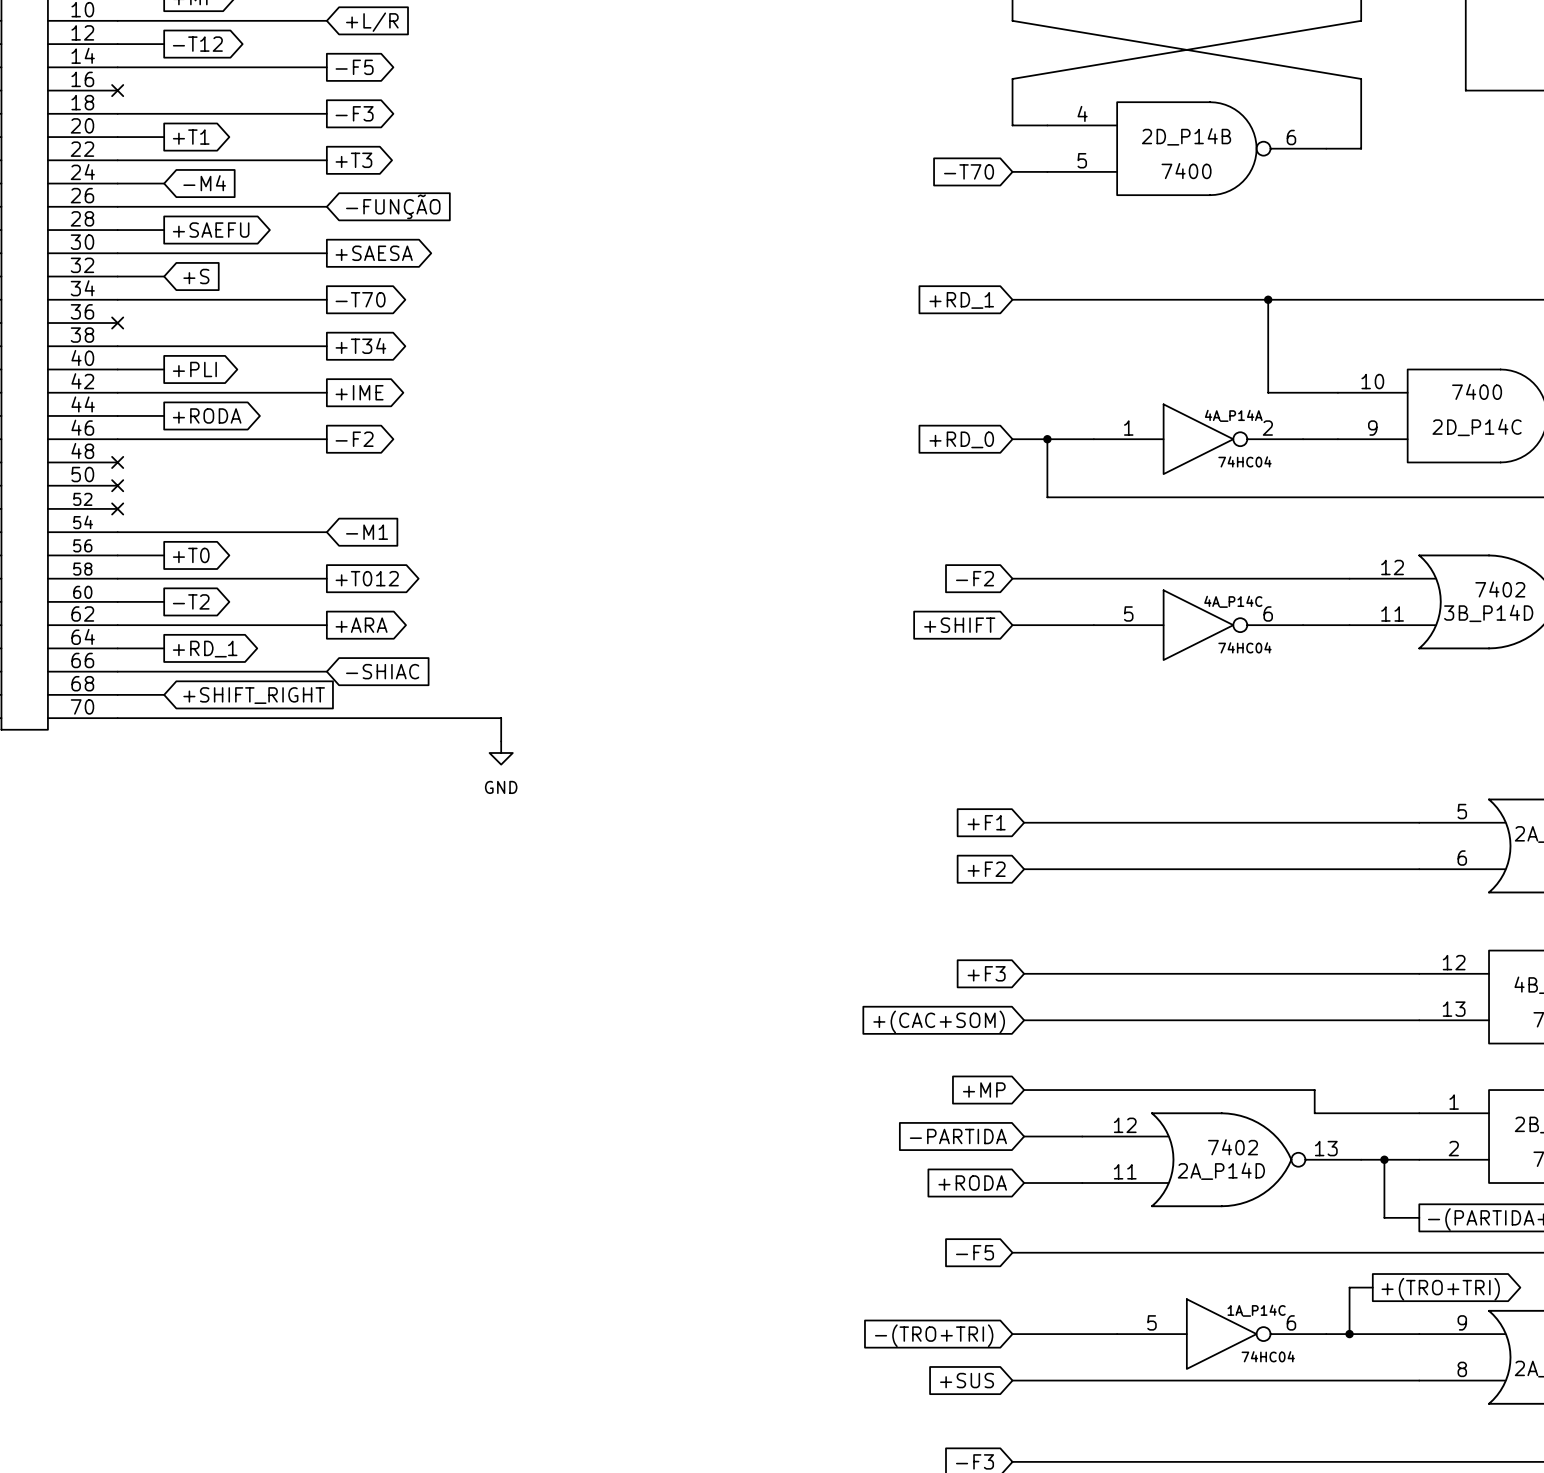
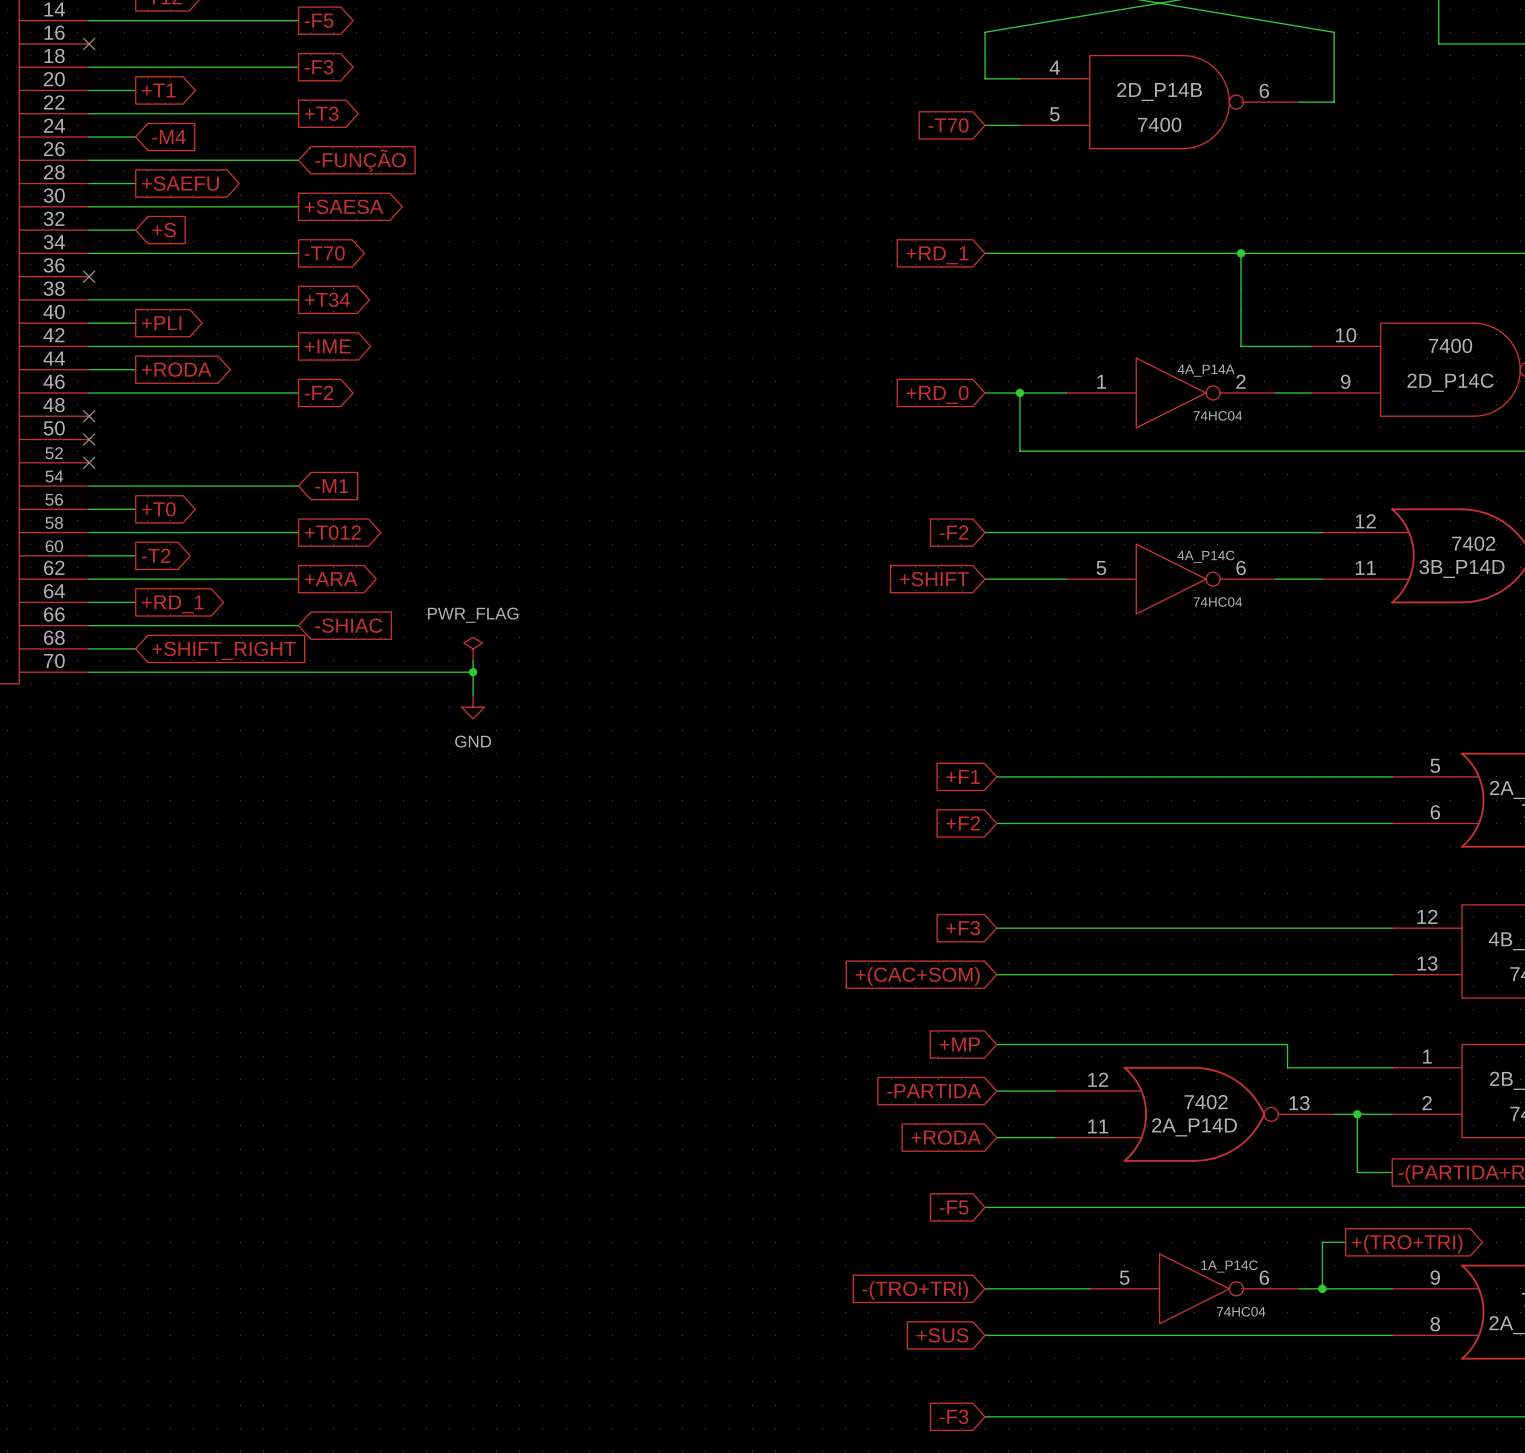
power symbol: none -> PWR_FLAG (473, 648)
wire: none -> (473, 660) (473, 672)
junction: none -> (473, 672)

